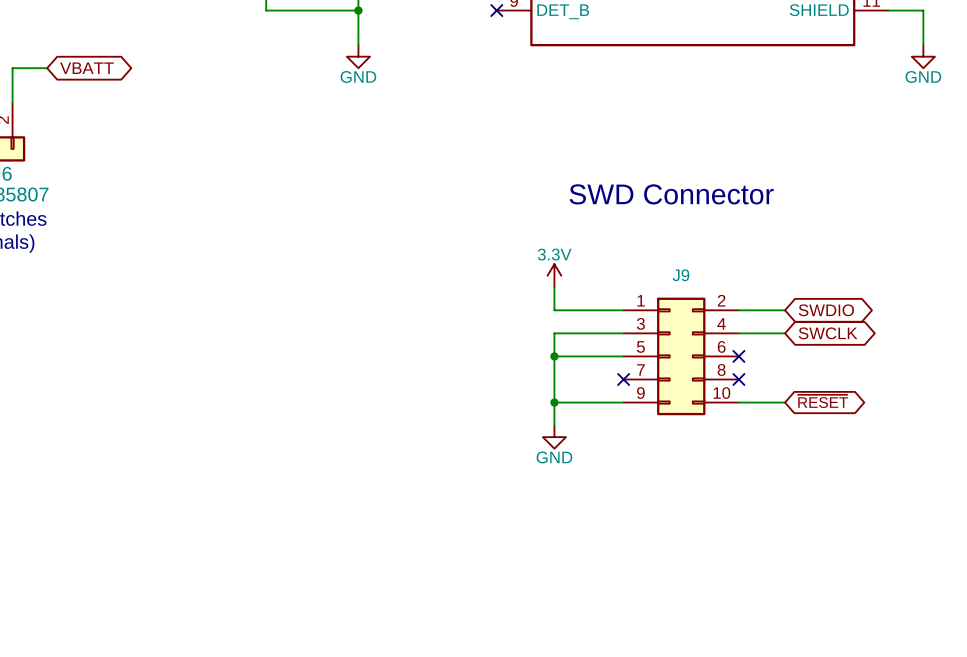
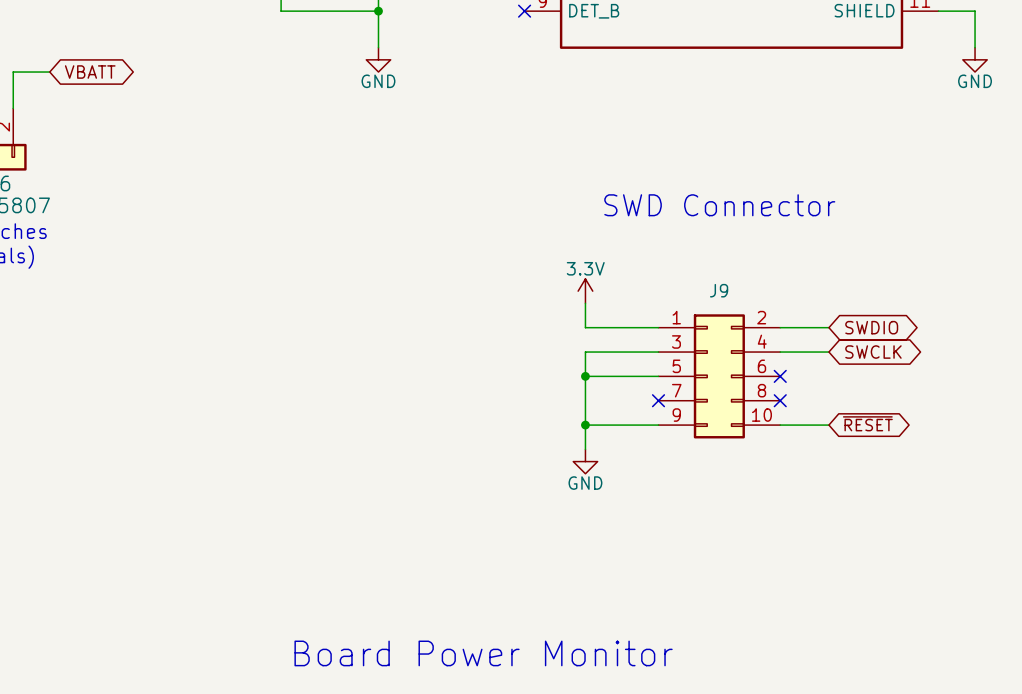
text: none -> Board Power Monitor (483, 653)

